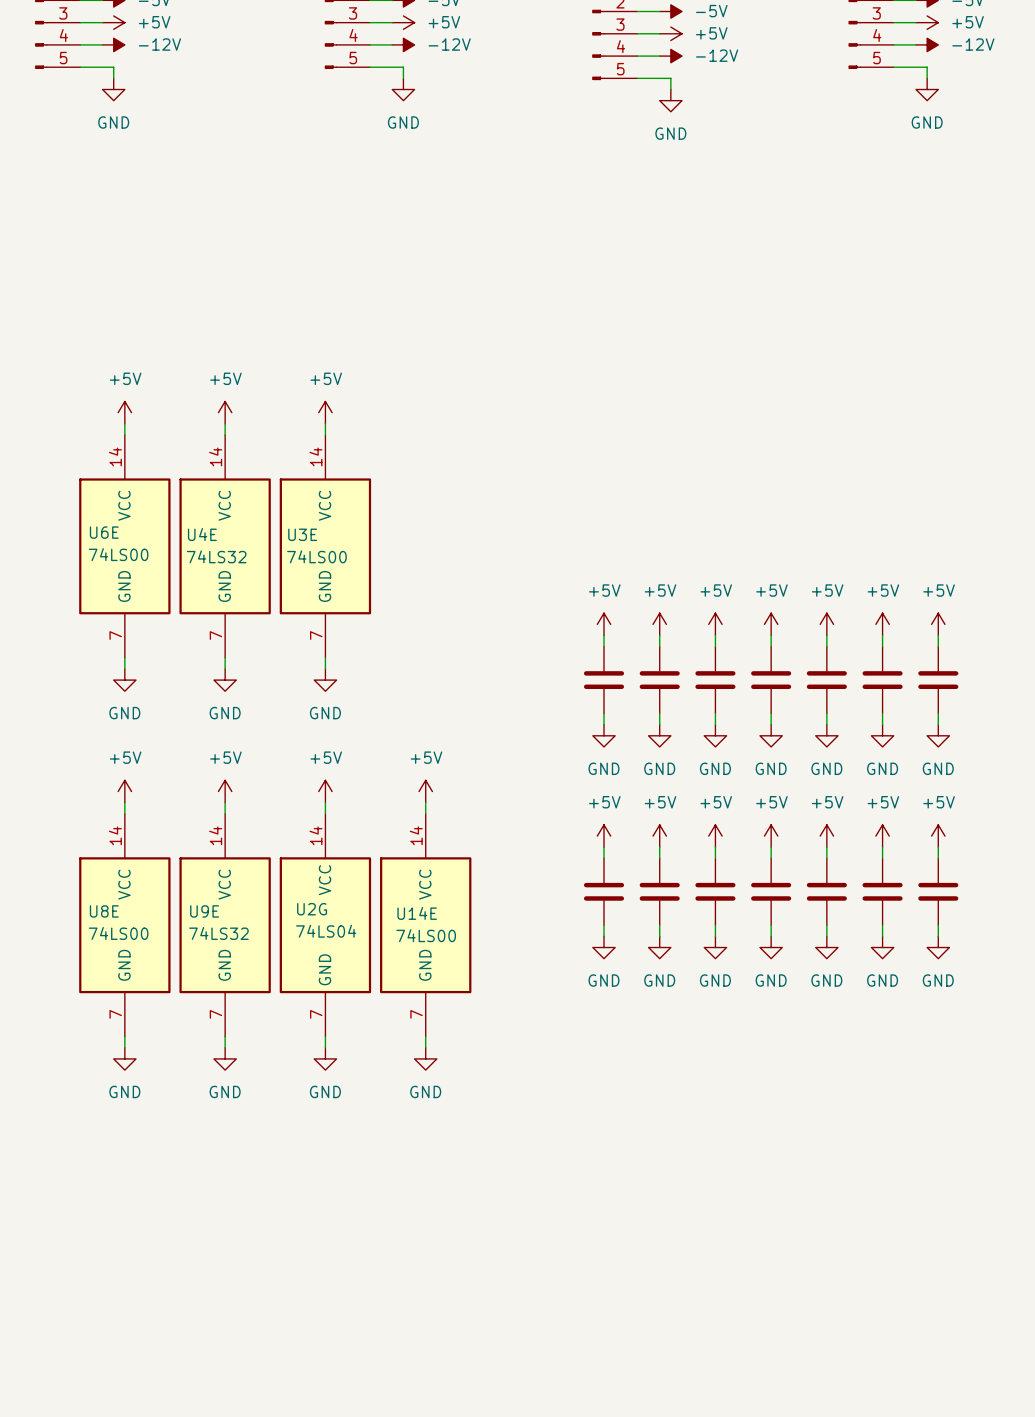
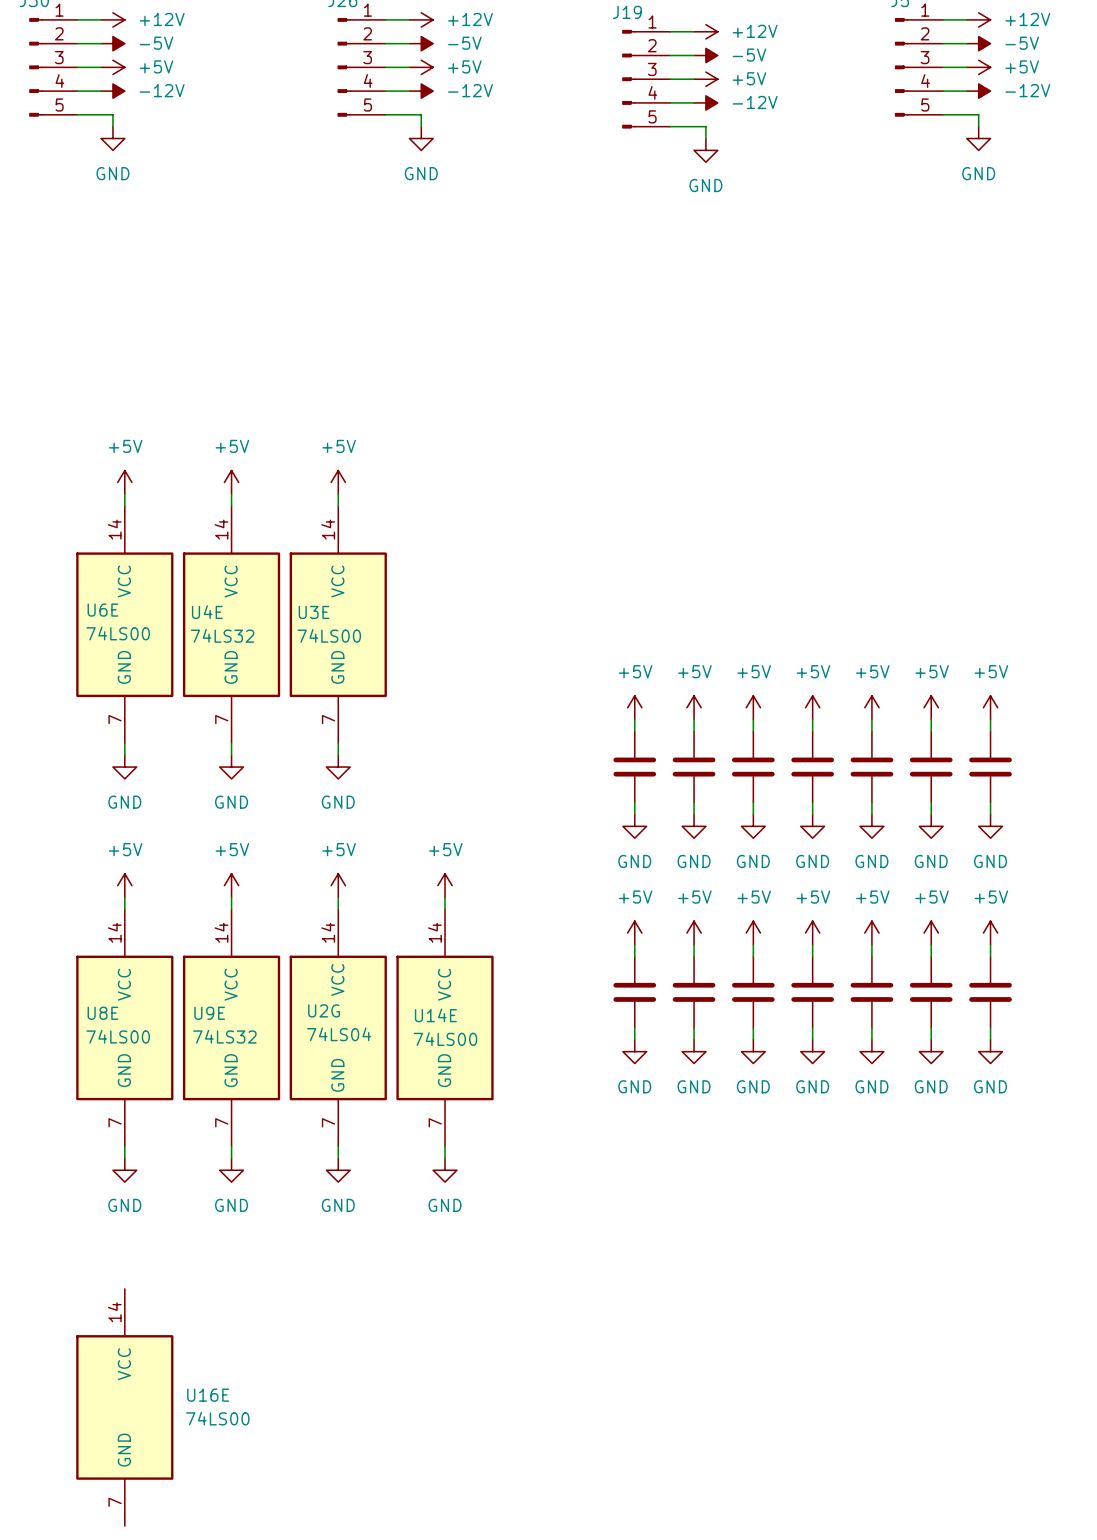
U16E: none -> 74LS00 (124, 1407)

